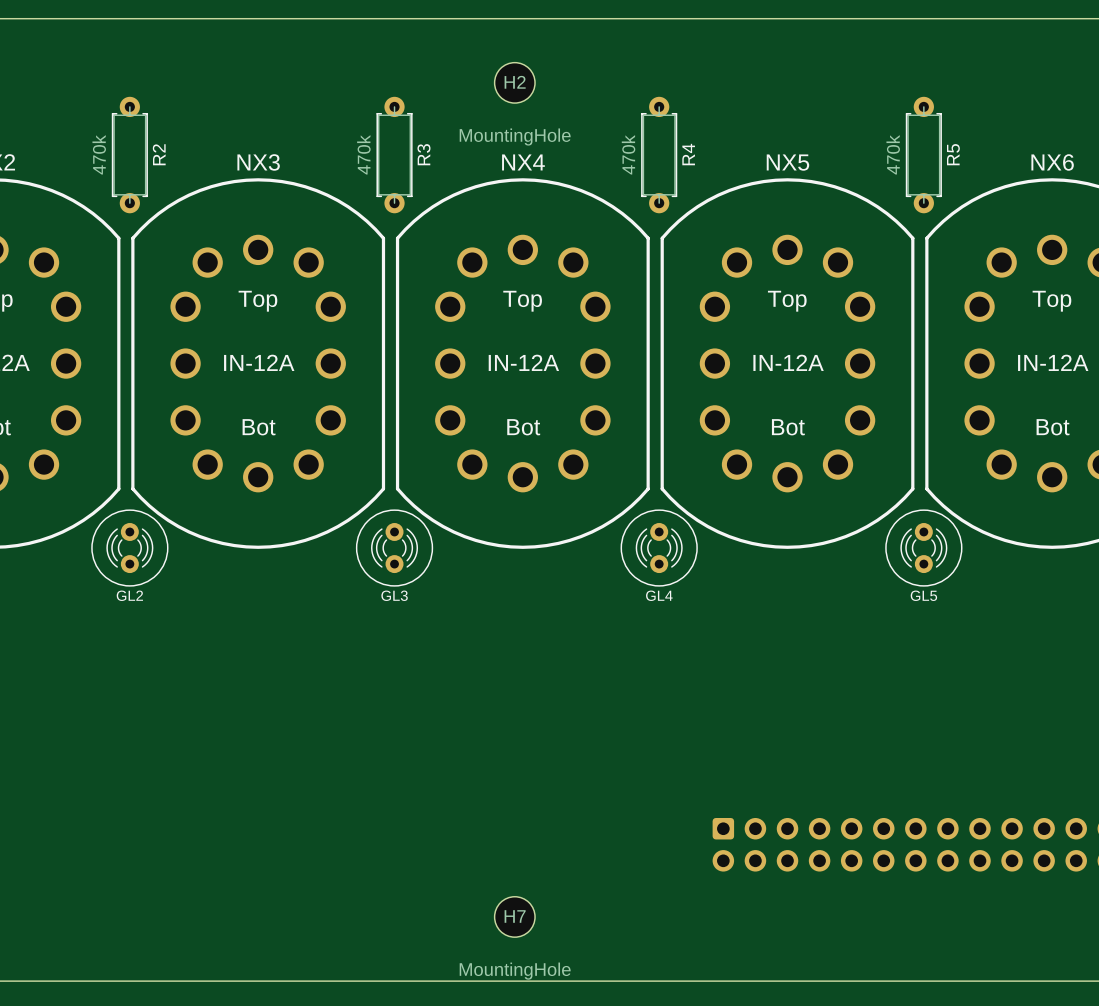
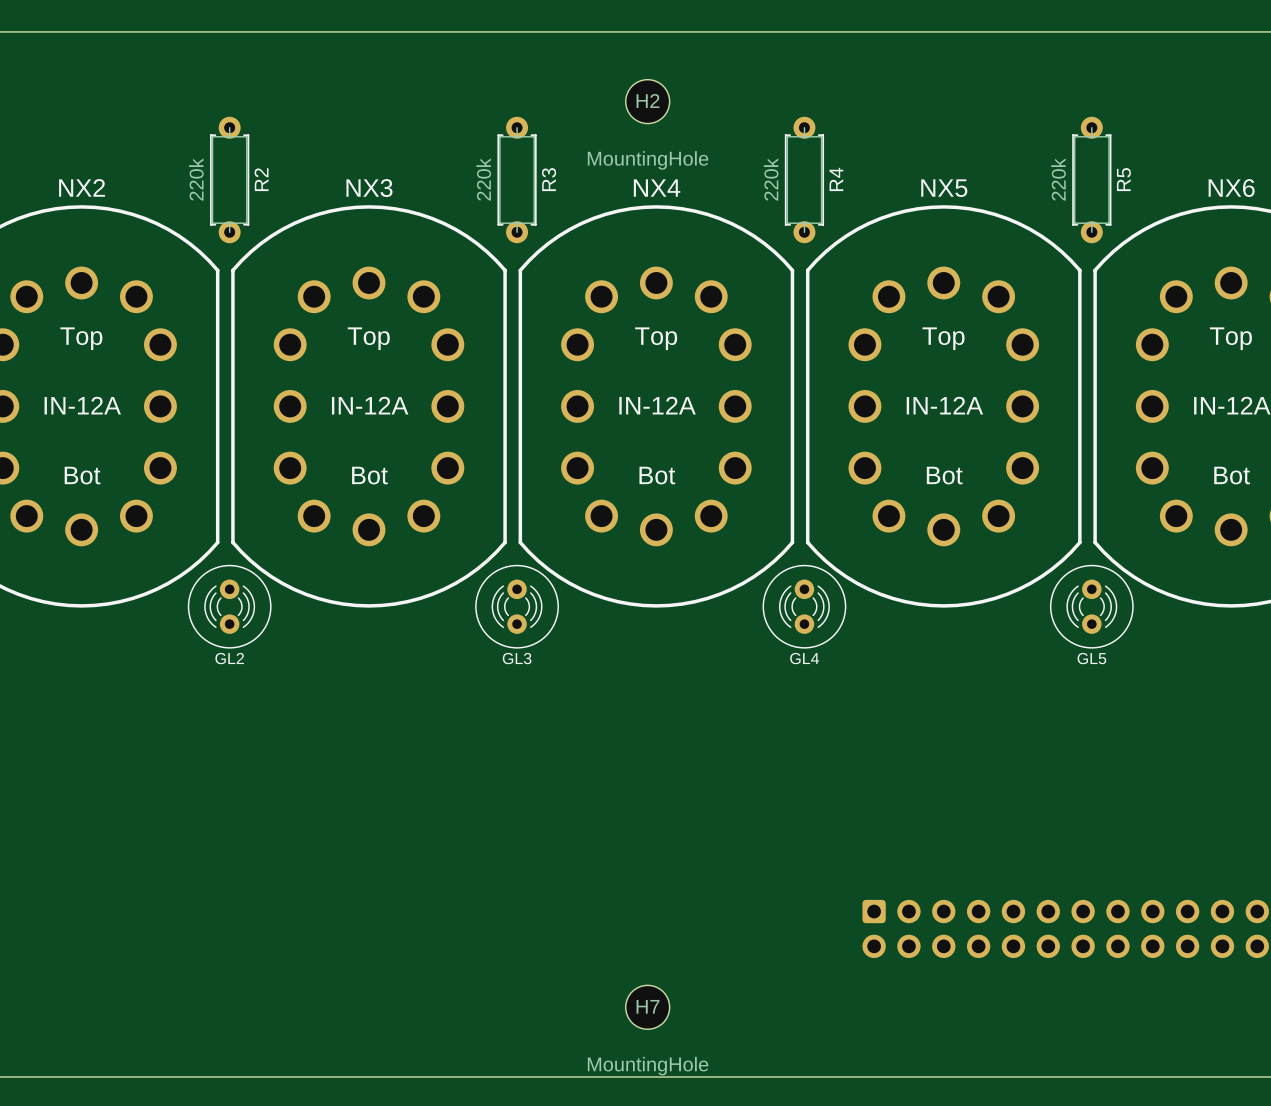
R2 value: 470k (99, 154) -> 220k (196, 179)
R3 value: 470k (363, 154) -> 220k (483, 179)
R4 value: 470k (628, 154) -> 220k (771, 179)
R5 value: 470k (893, 154) -> 220k (1058, 179)

